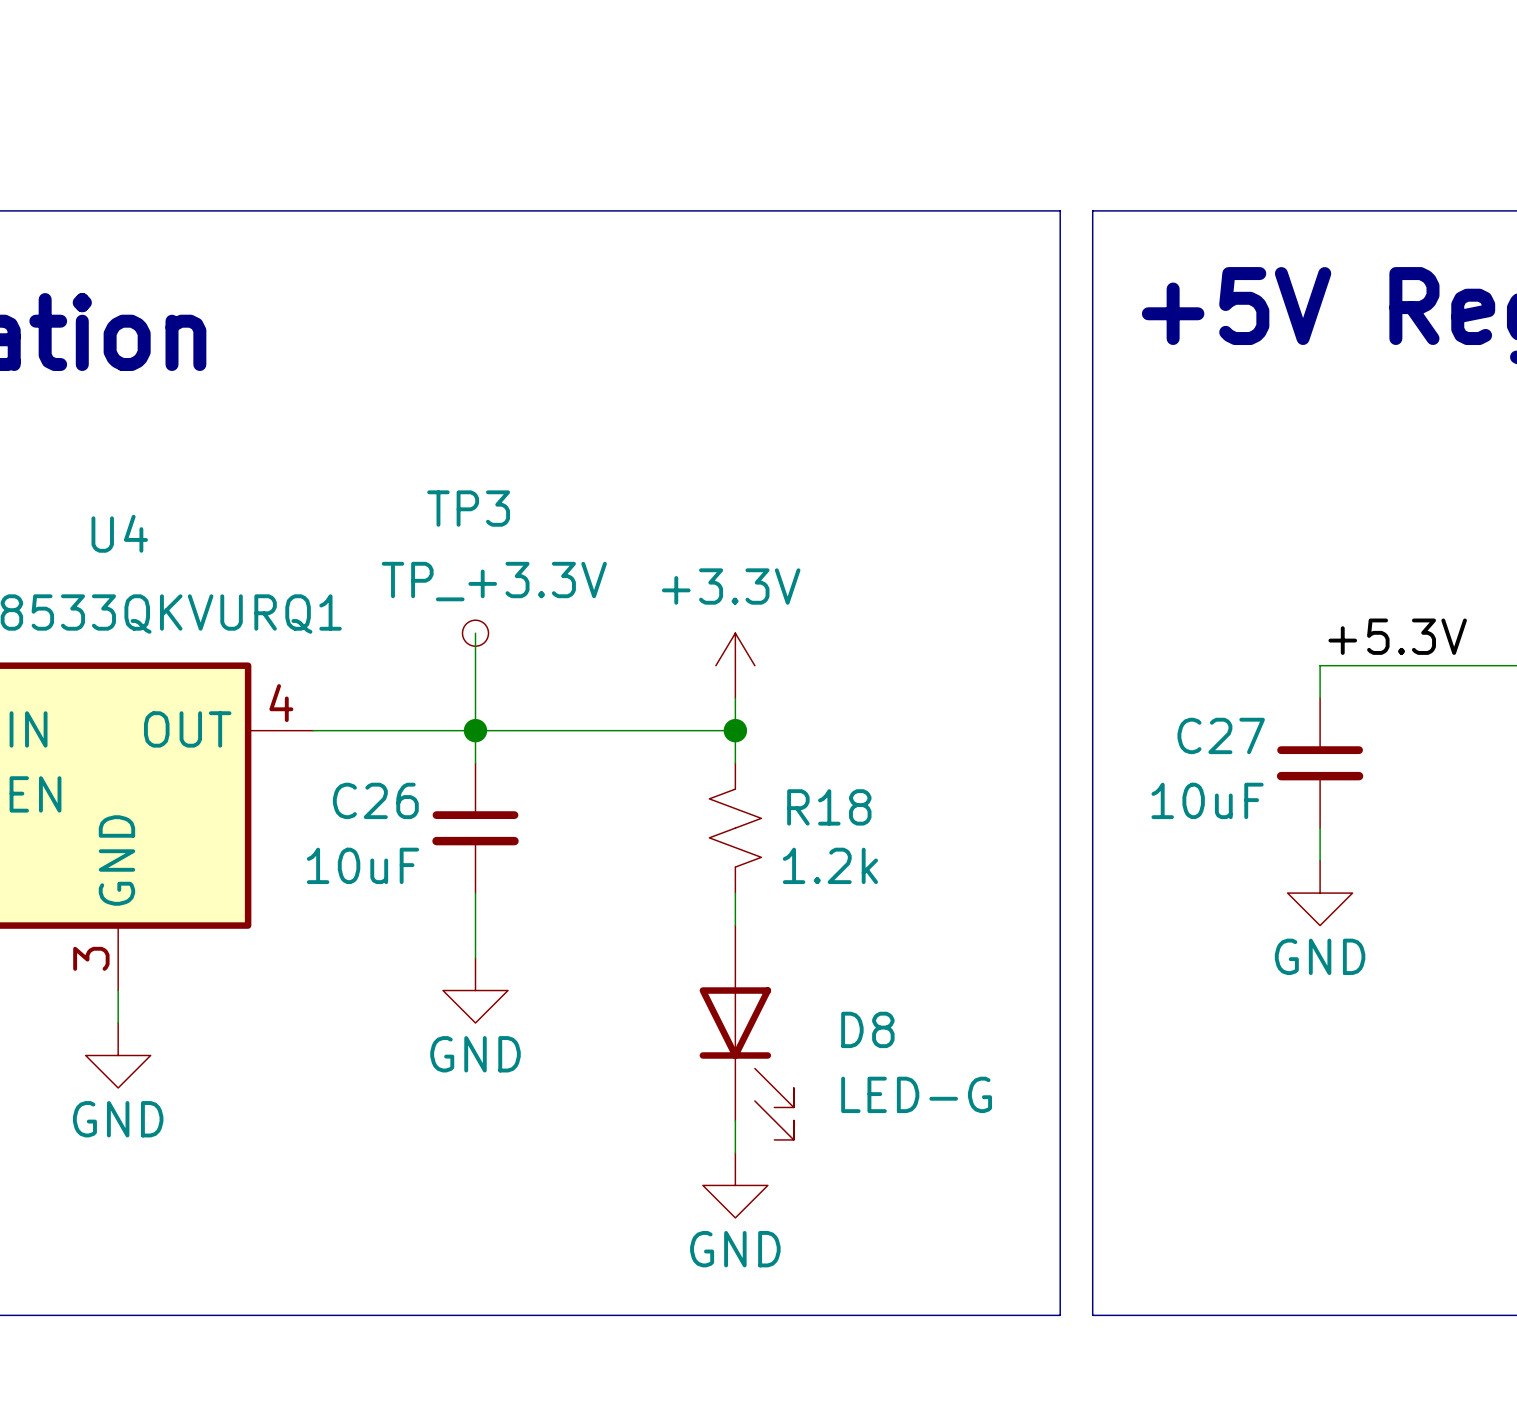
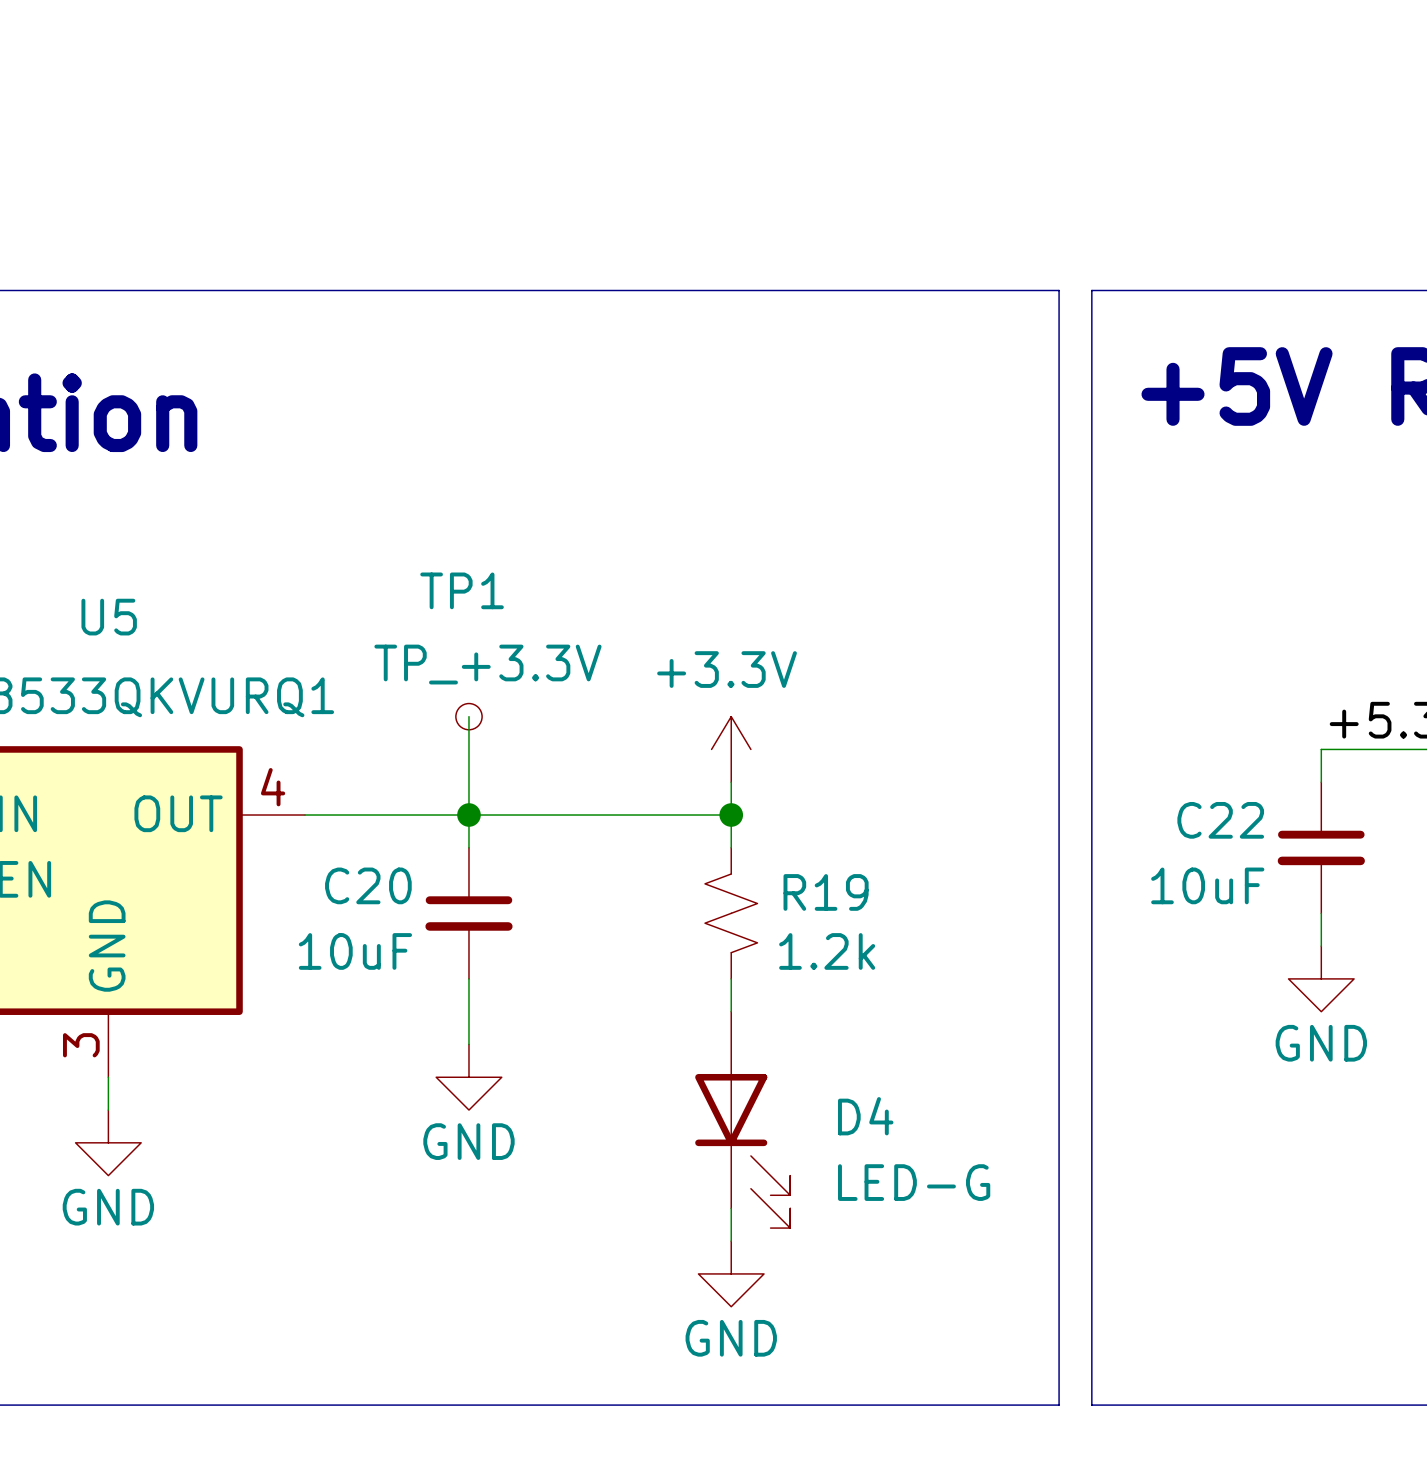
TP3 name: TP3 (468, 508) -> TP1 (462, 590)
U4 name: U4 (119, 533) -> U5 (109, 617)
C27 name: C27 (1221, 735) -> C22 (1220, 820)
C26 name: C26 (375, 800) -> C20 (368, 885)
R18 name: R18 (829, 807) -> R19 (826, 892)
D8 name: D8 (867, 1029) -> D4 (865, 1116)

